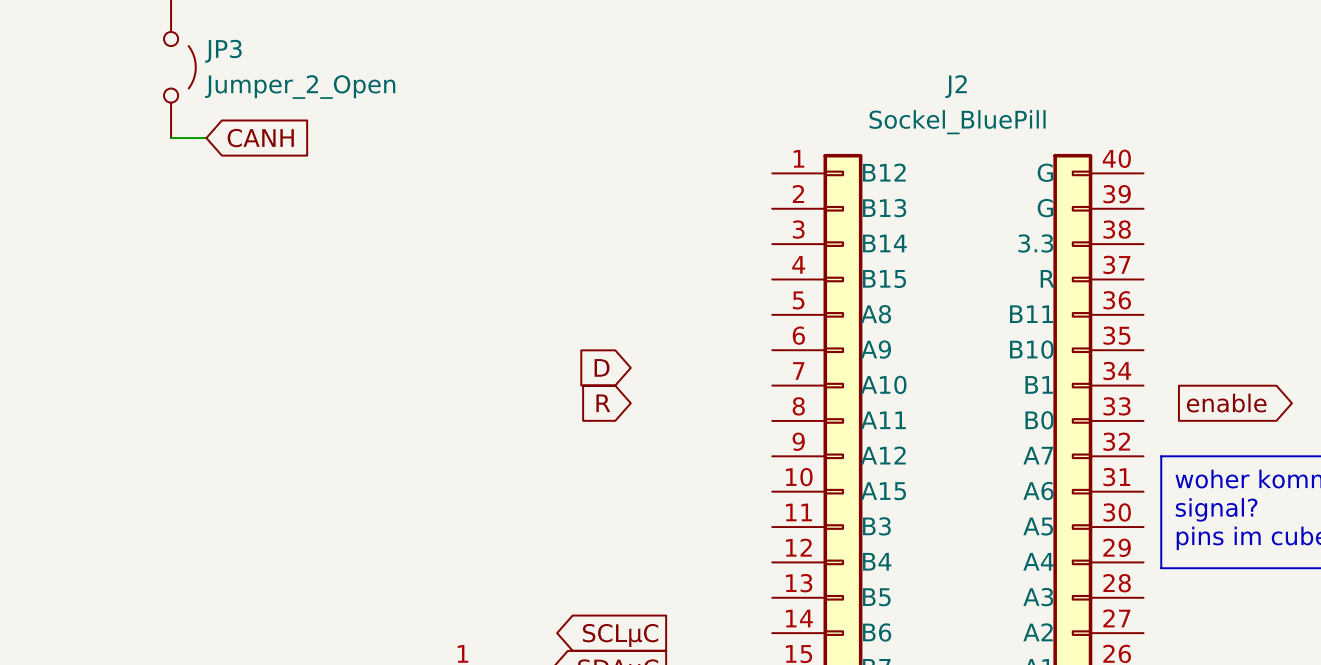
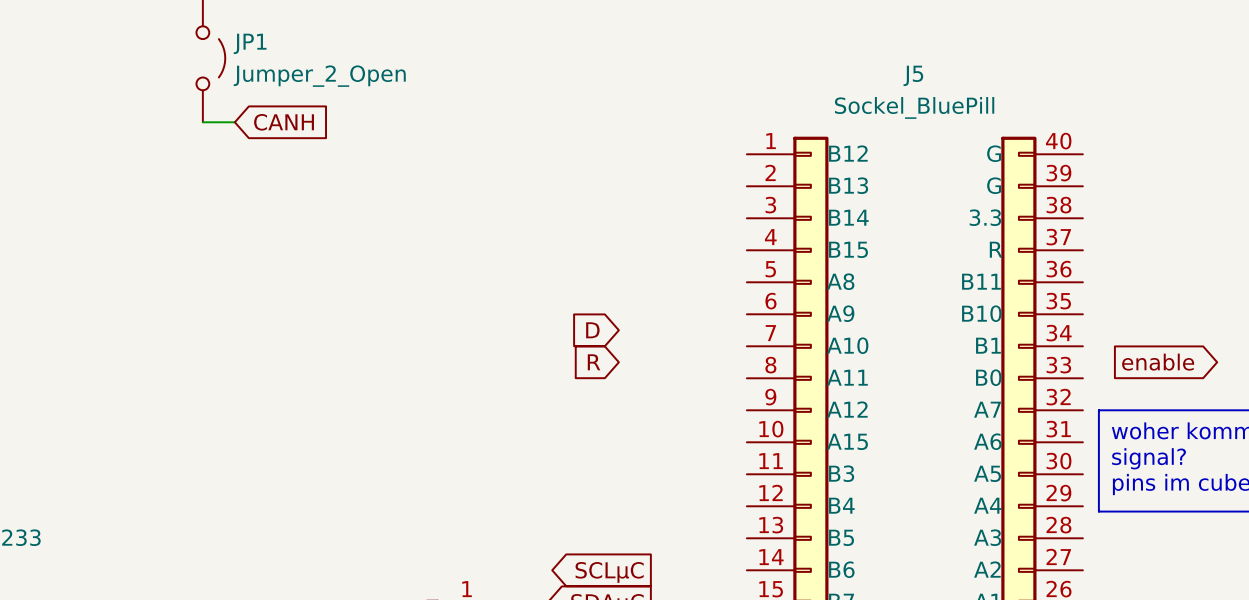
JP3 name: JP3 (223, 51) -> JP1 (250, 43)
J2 name: J2 (956, 86) -> J5 (913, 75)

